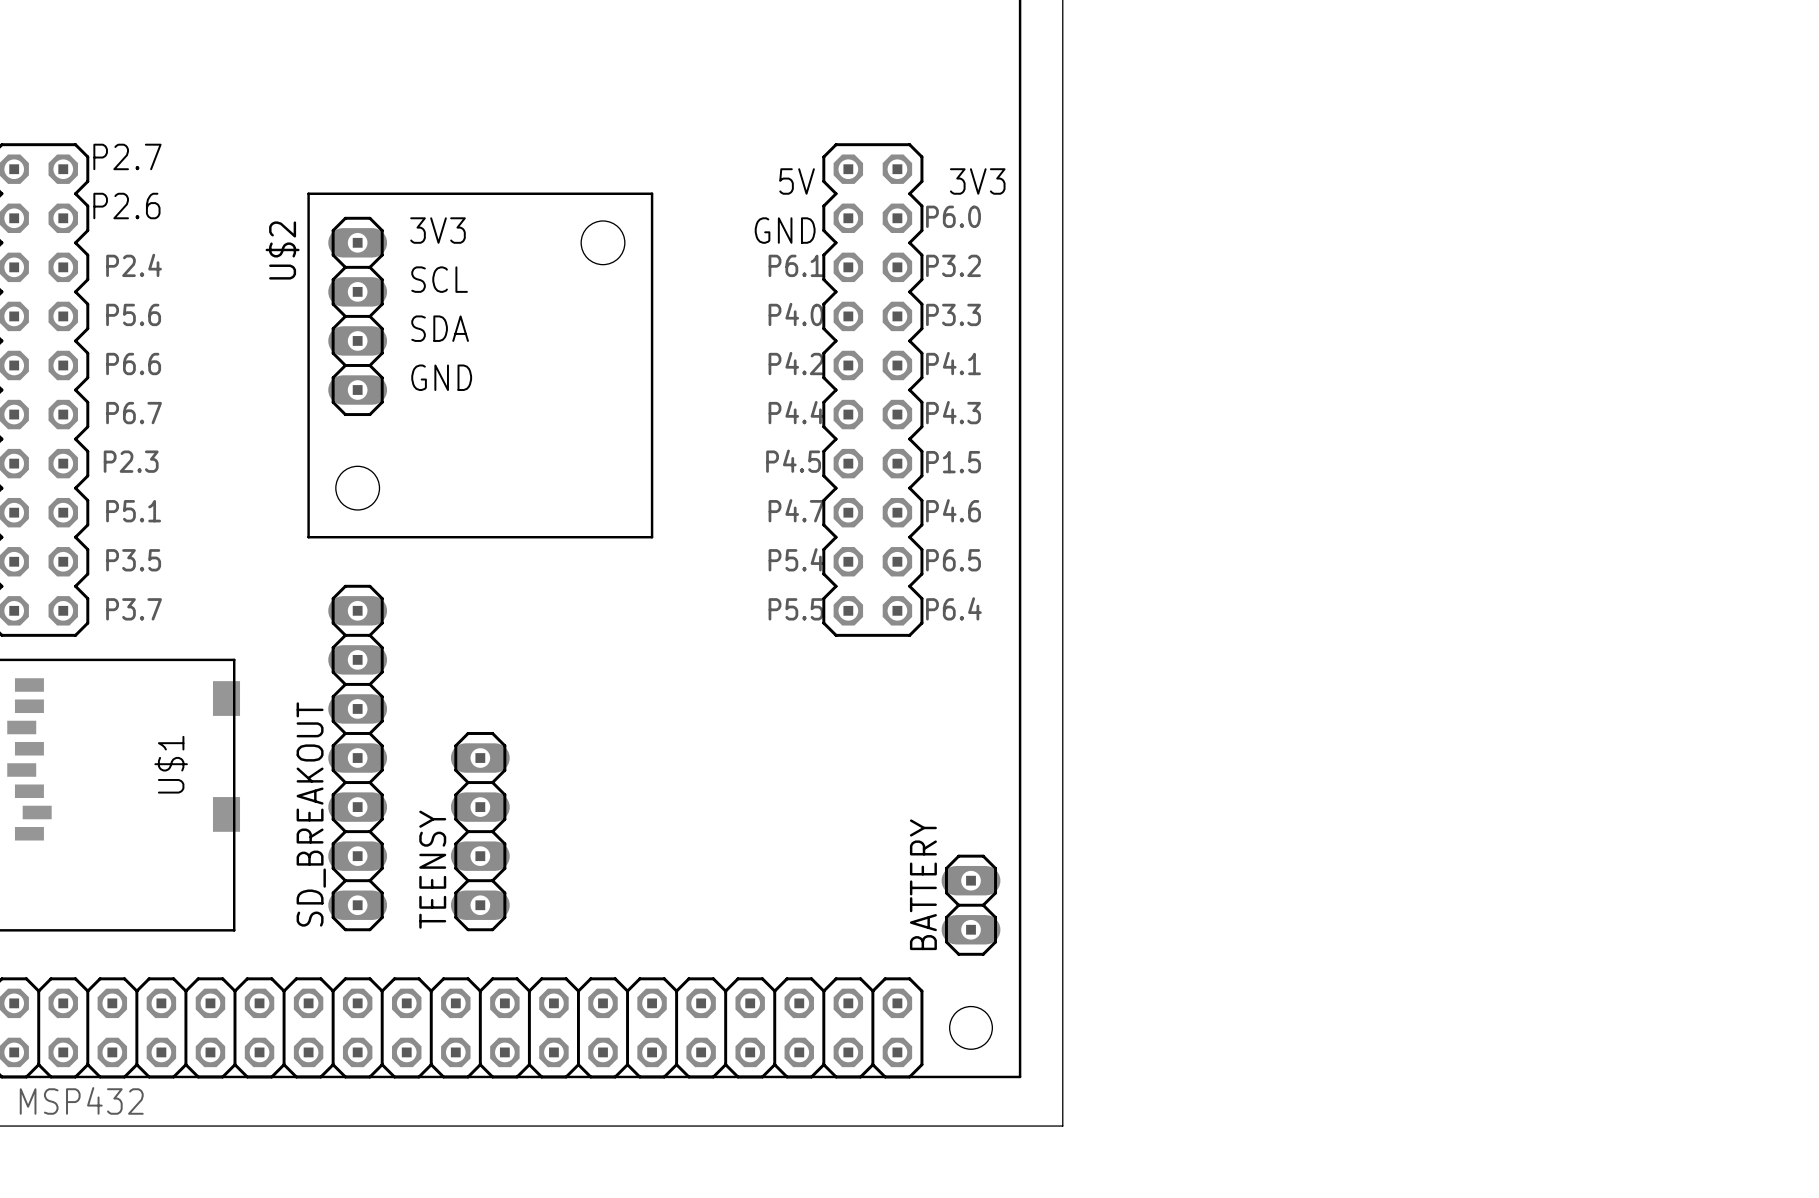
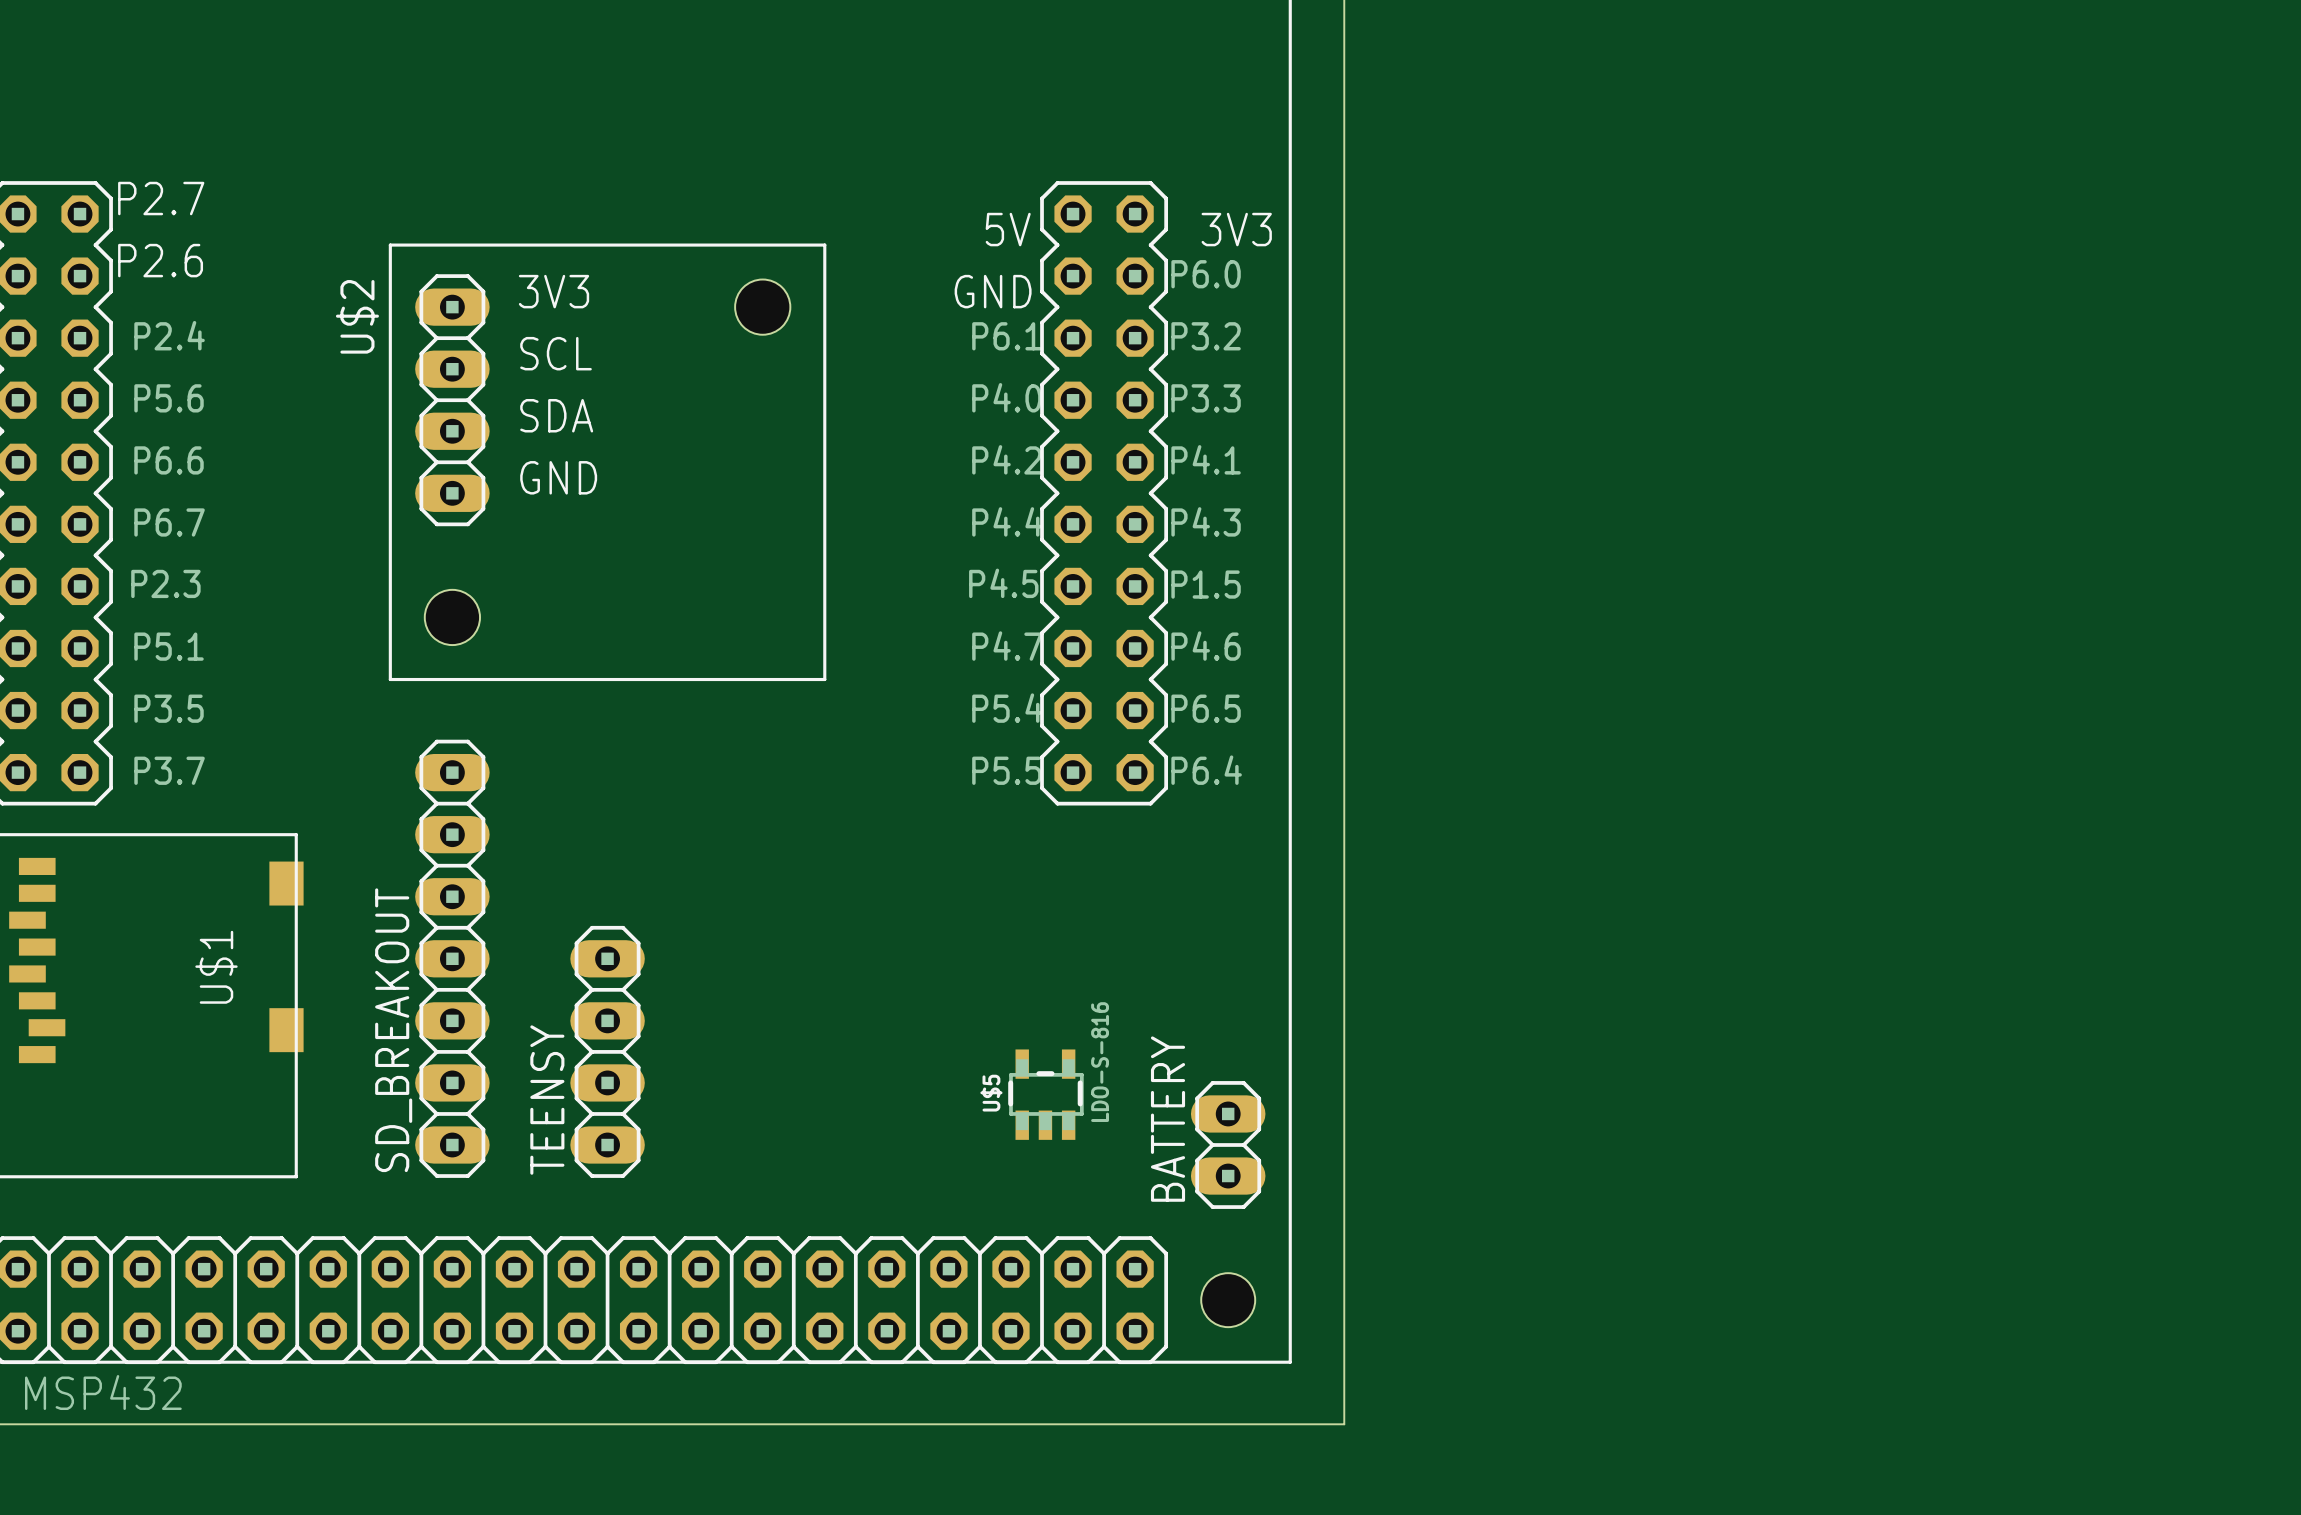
U$5: none -> LDO-S-816 (1045, 1094)

